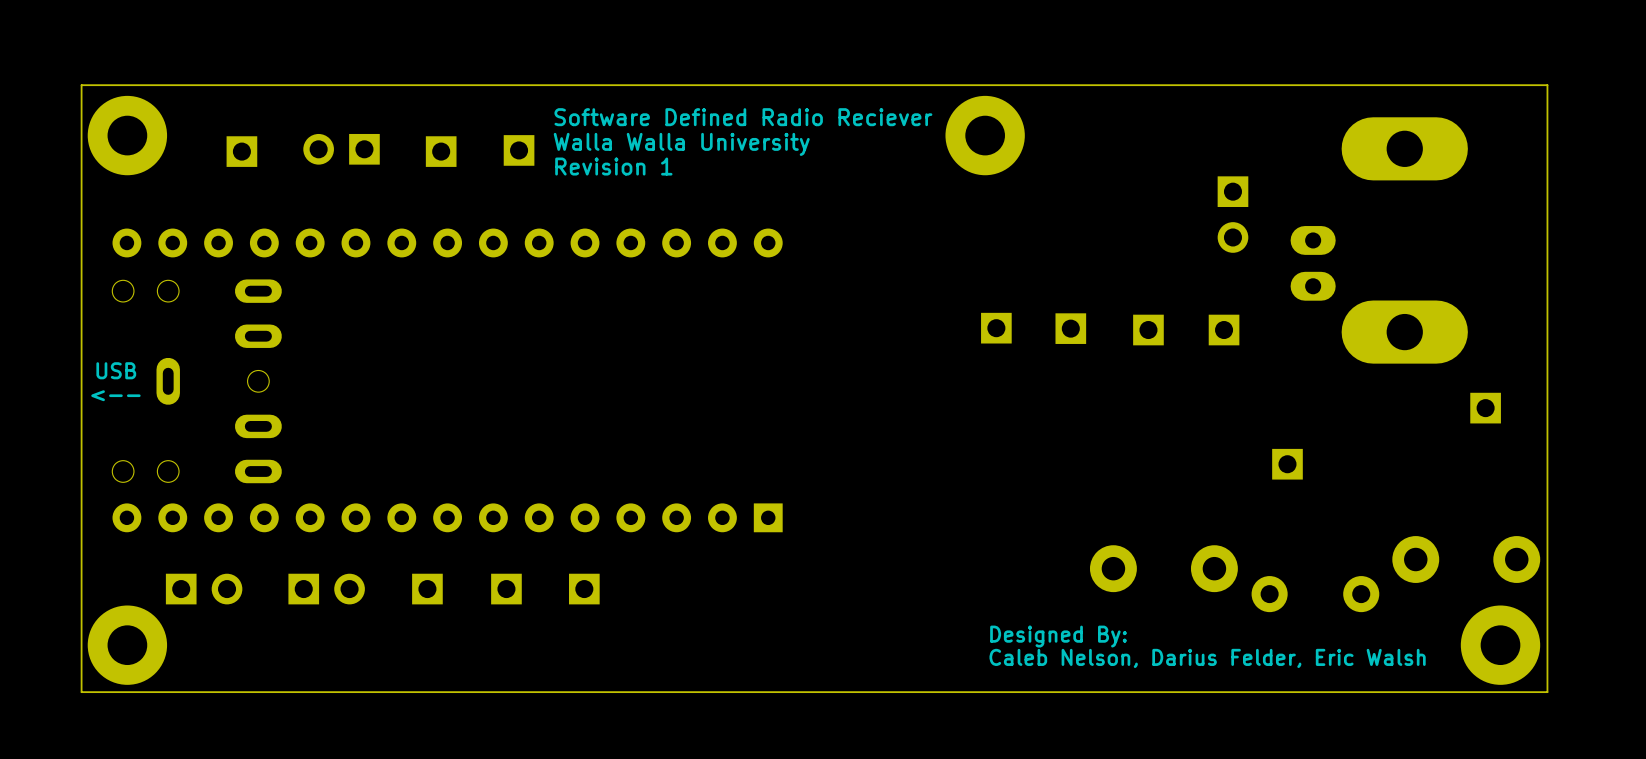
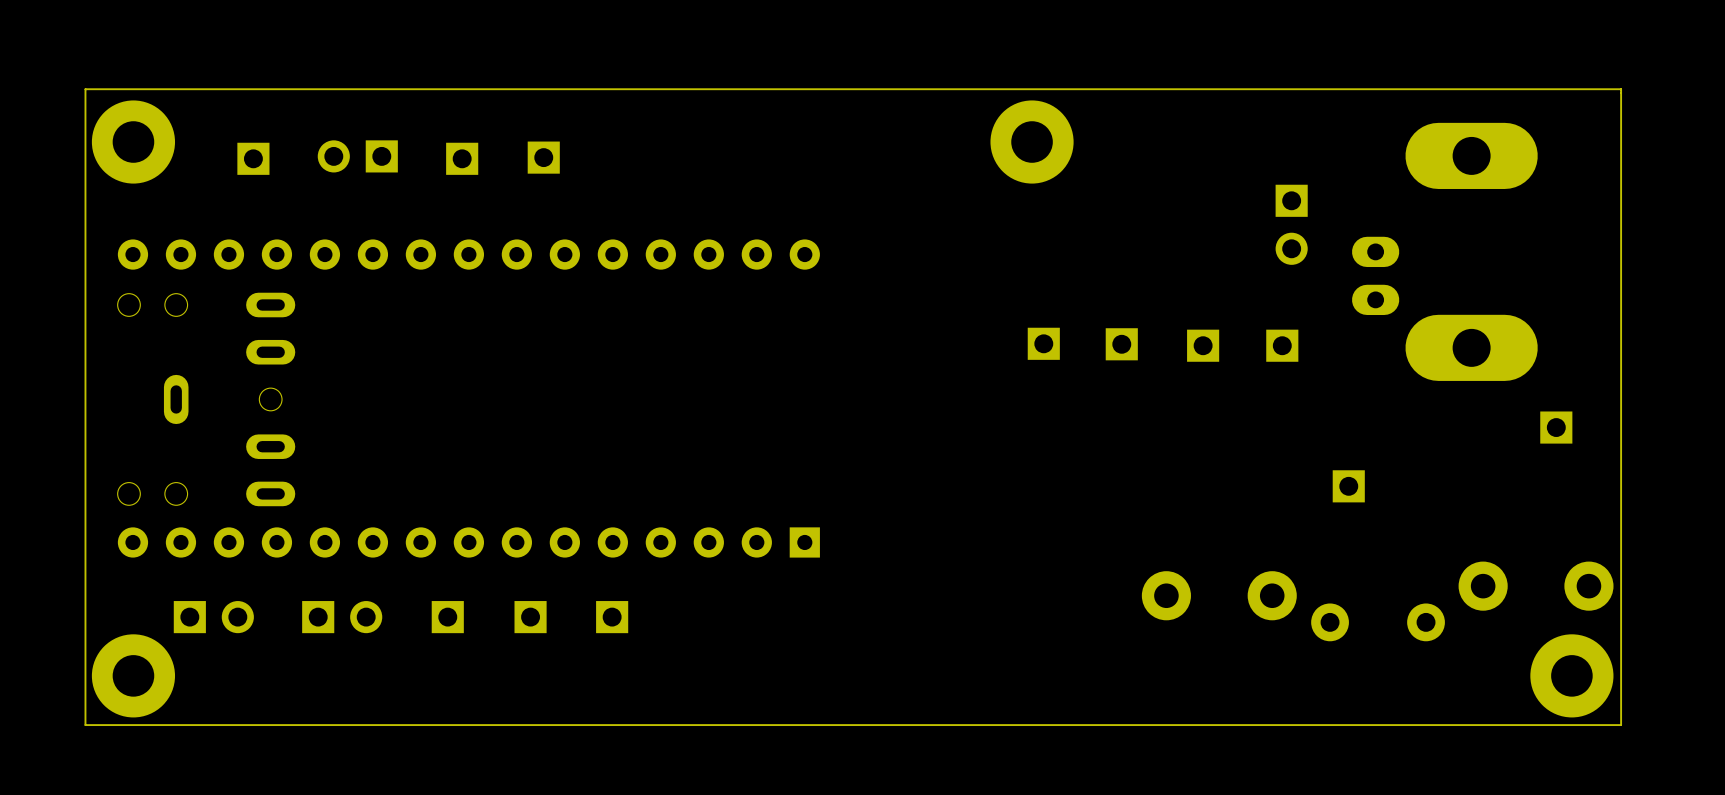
text: Software Defined Radio Reciever (743, 117) -> none
text: Walla Walla University (681, 144) -> none
text: Revision 1 (613, 166) -> none
text: USB (116, 370) -> none
text: <-- (115, 395) -> none
text: Designed By: (1058, 636) -> none
text: Caleb Nelson, Darius Felder, Eric Walsh (1207, 658) -> none

